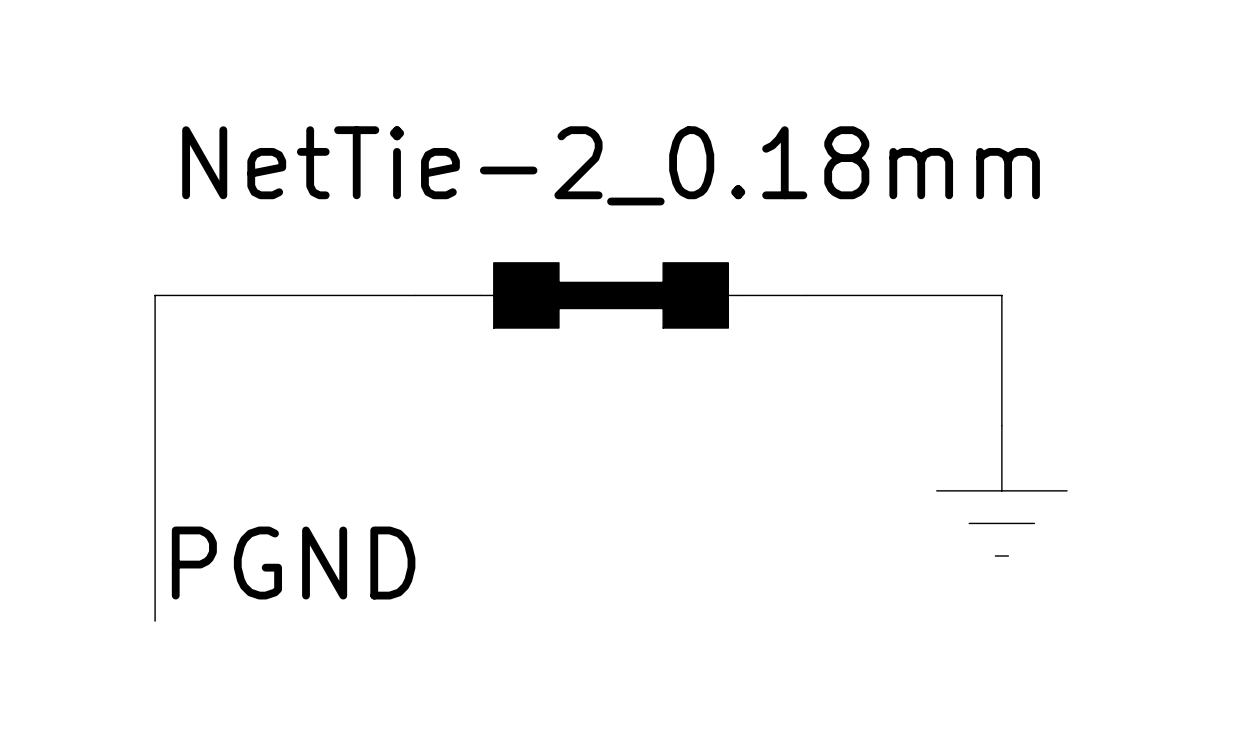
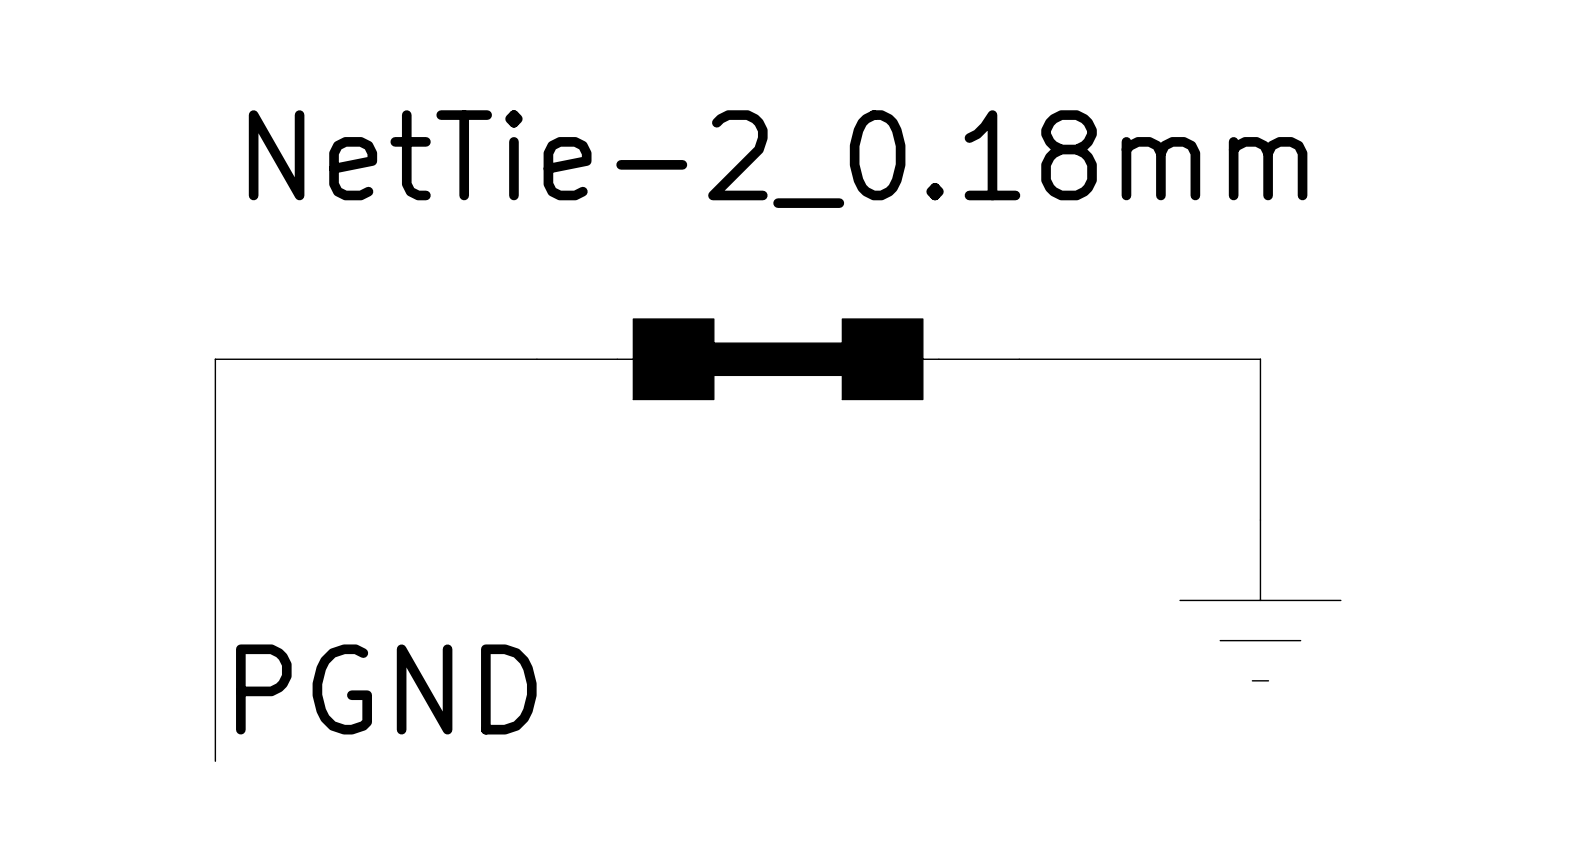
part value position: NetTie-2_0.18mm (611, 165) -> NetTie-2_0.18mm (778, 159)

